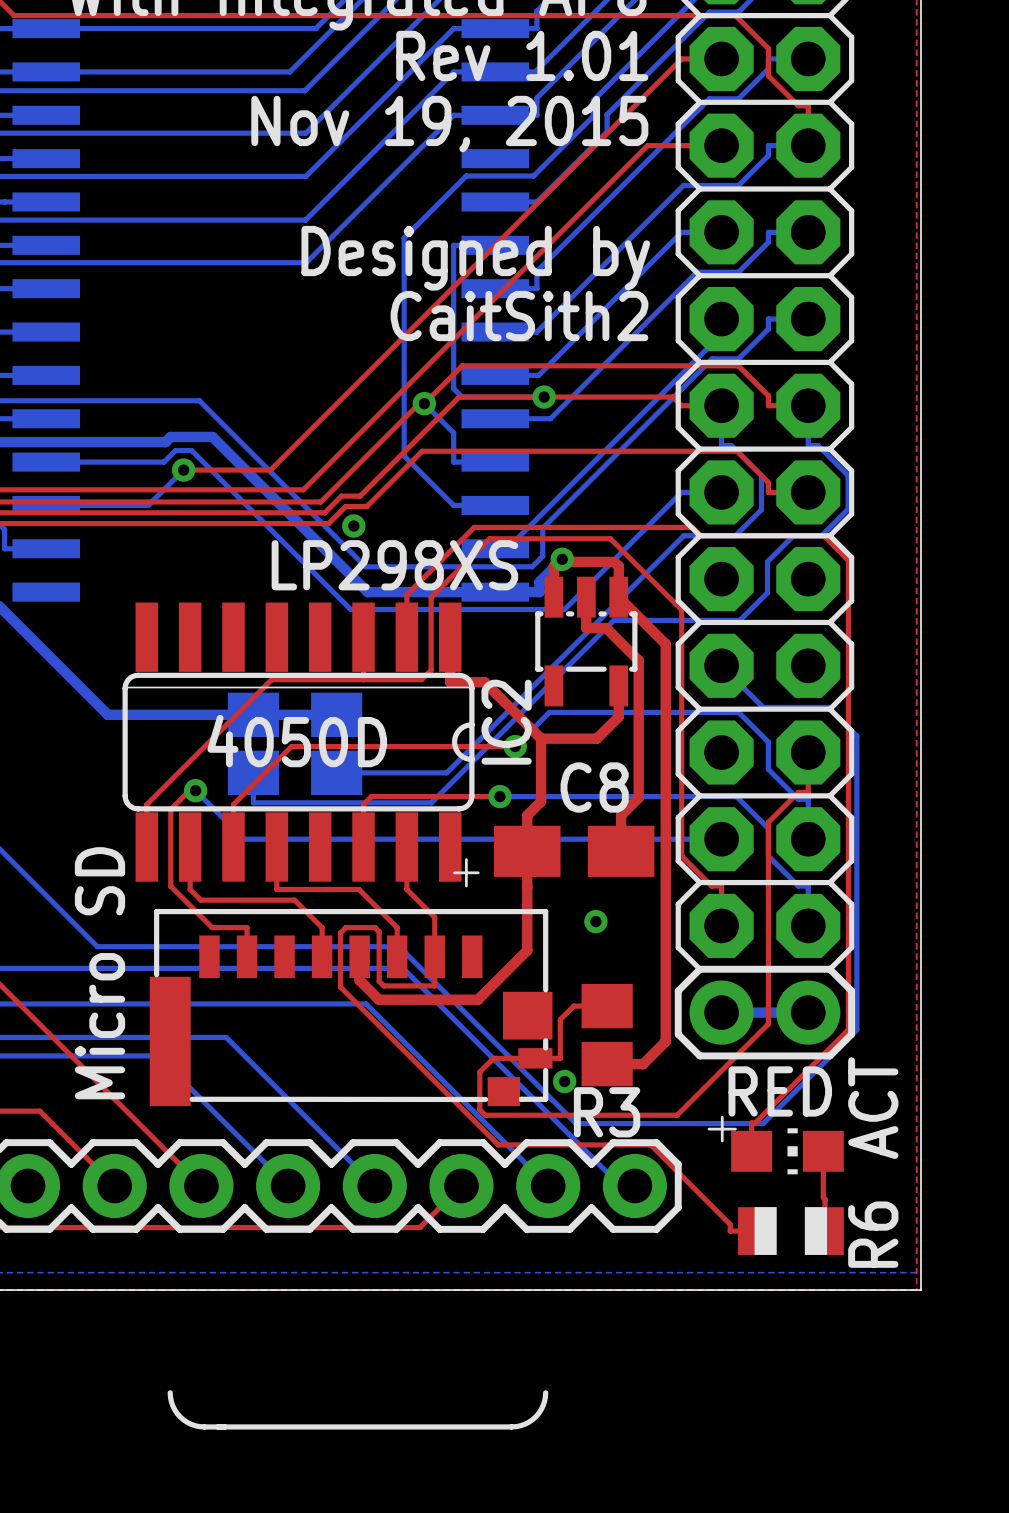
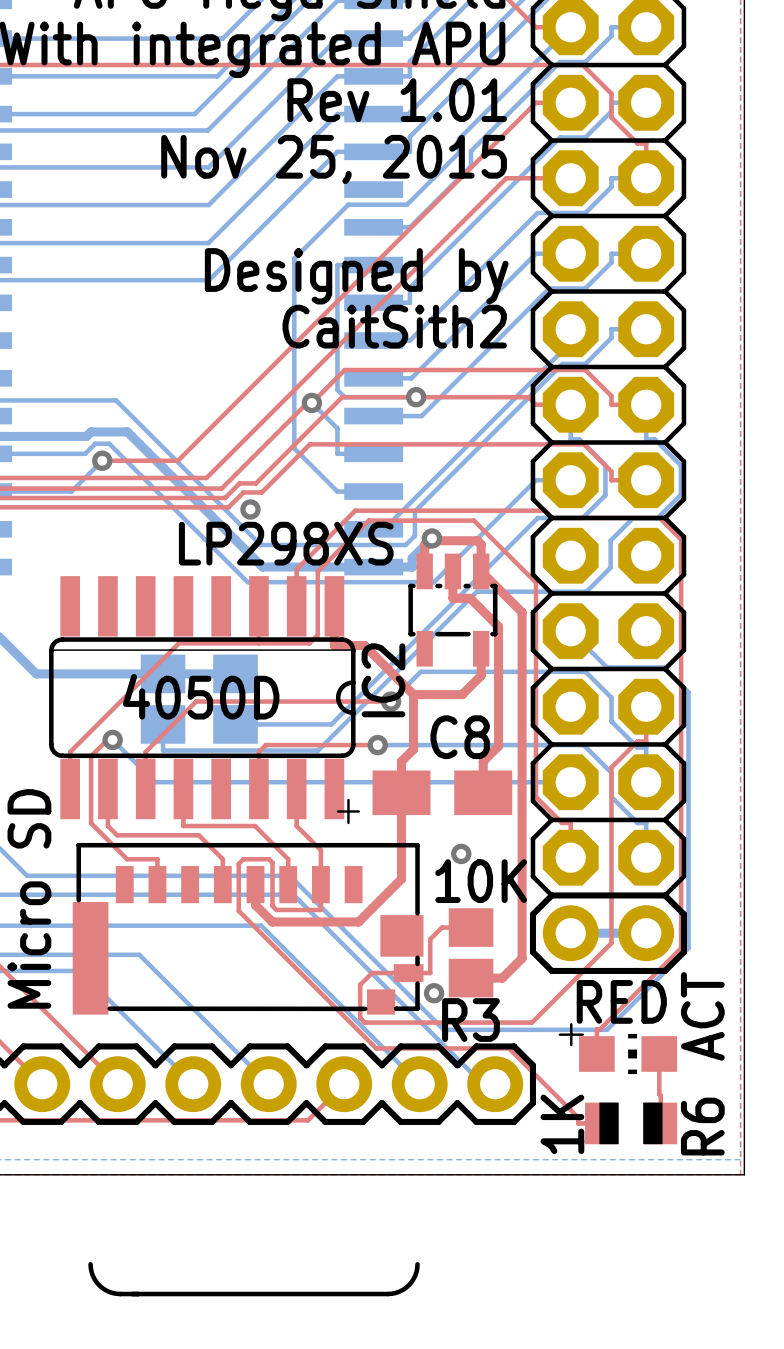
text: Nov 19, 2015 (449, 124) -> Nov 25, 2015 (334, 159)
R3 value: none -> 10K (481, 881)
R6 value: none -> 1K (562, 1124)

